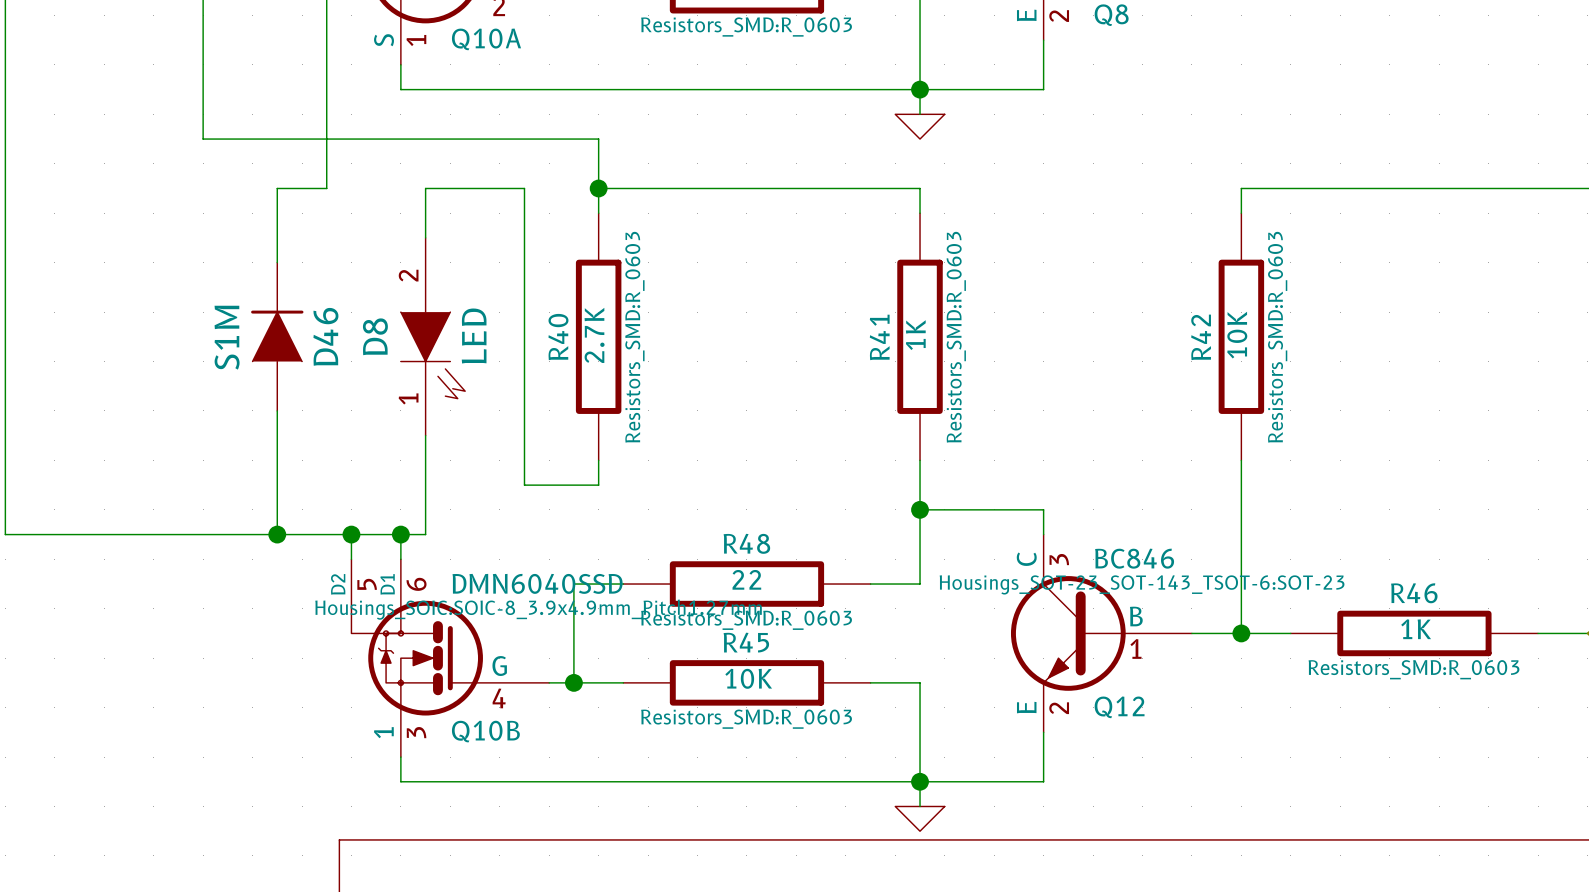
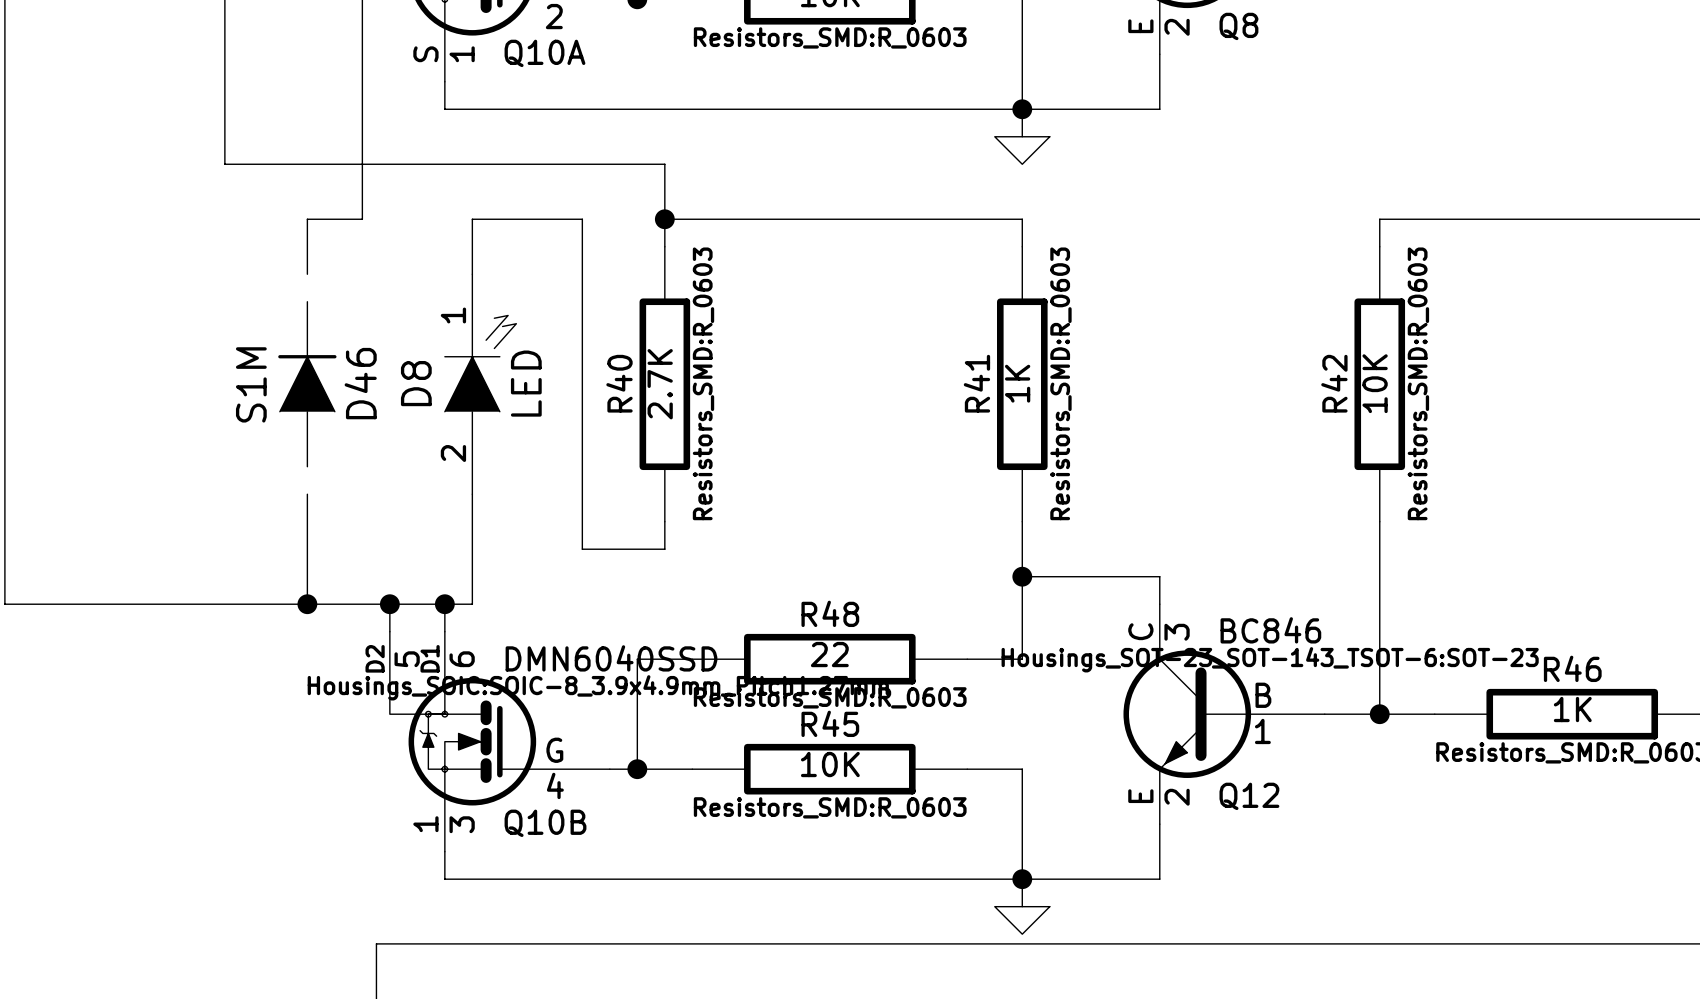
wire: (277, 237) (277, 262) -> none
D8 flip: as is (433, 355) -> up-down (480, 363)
wire: (277, 410) (277, 435) -> none

